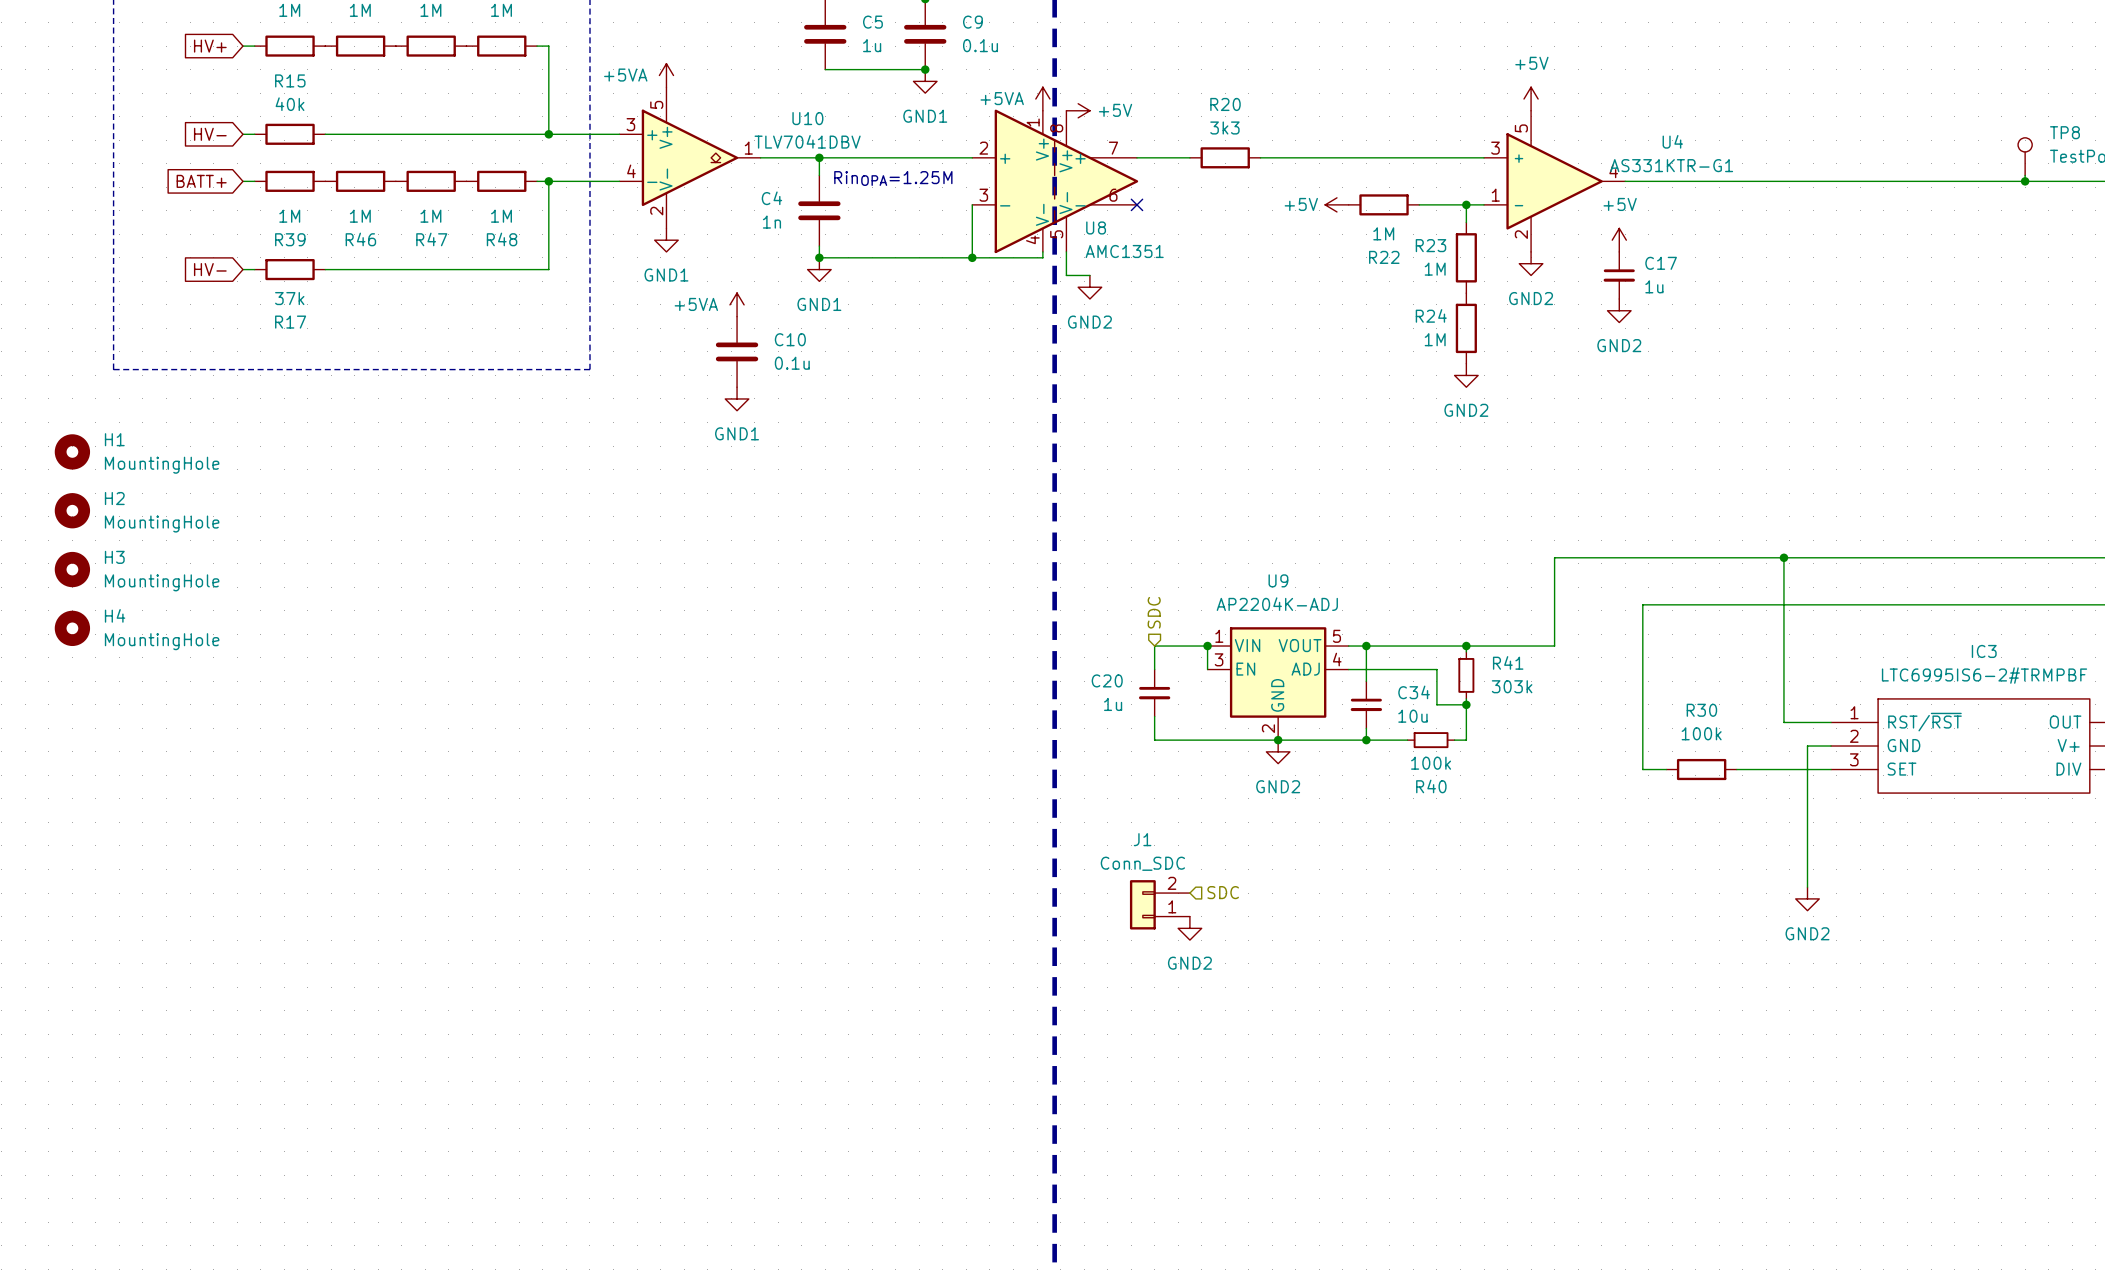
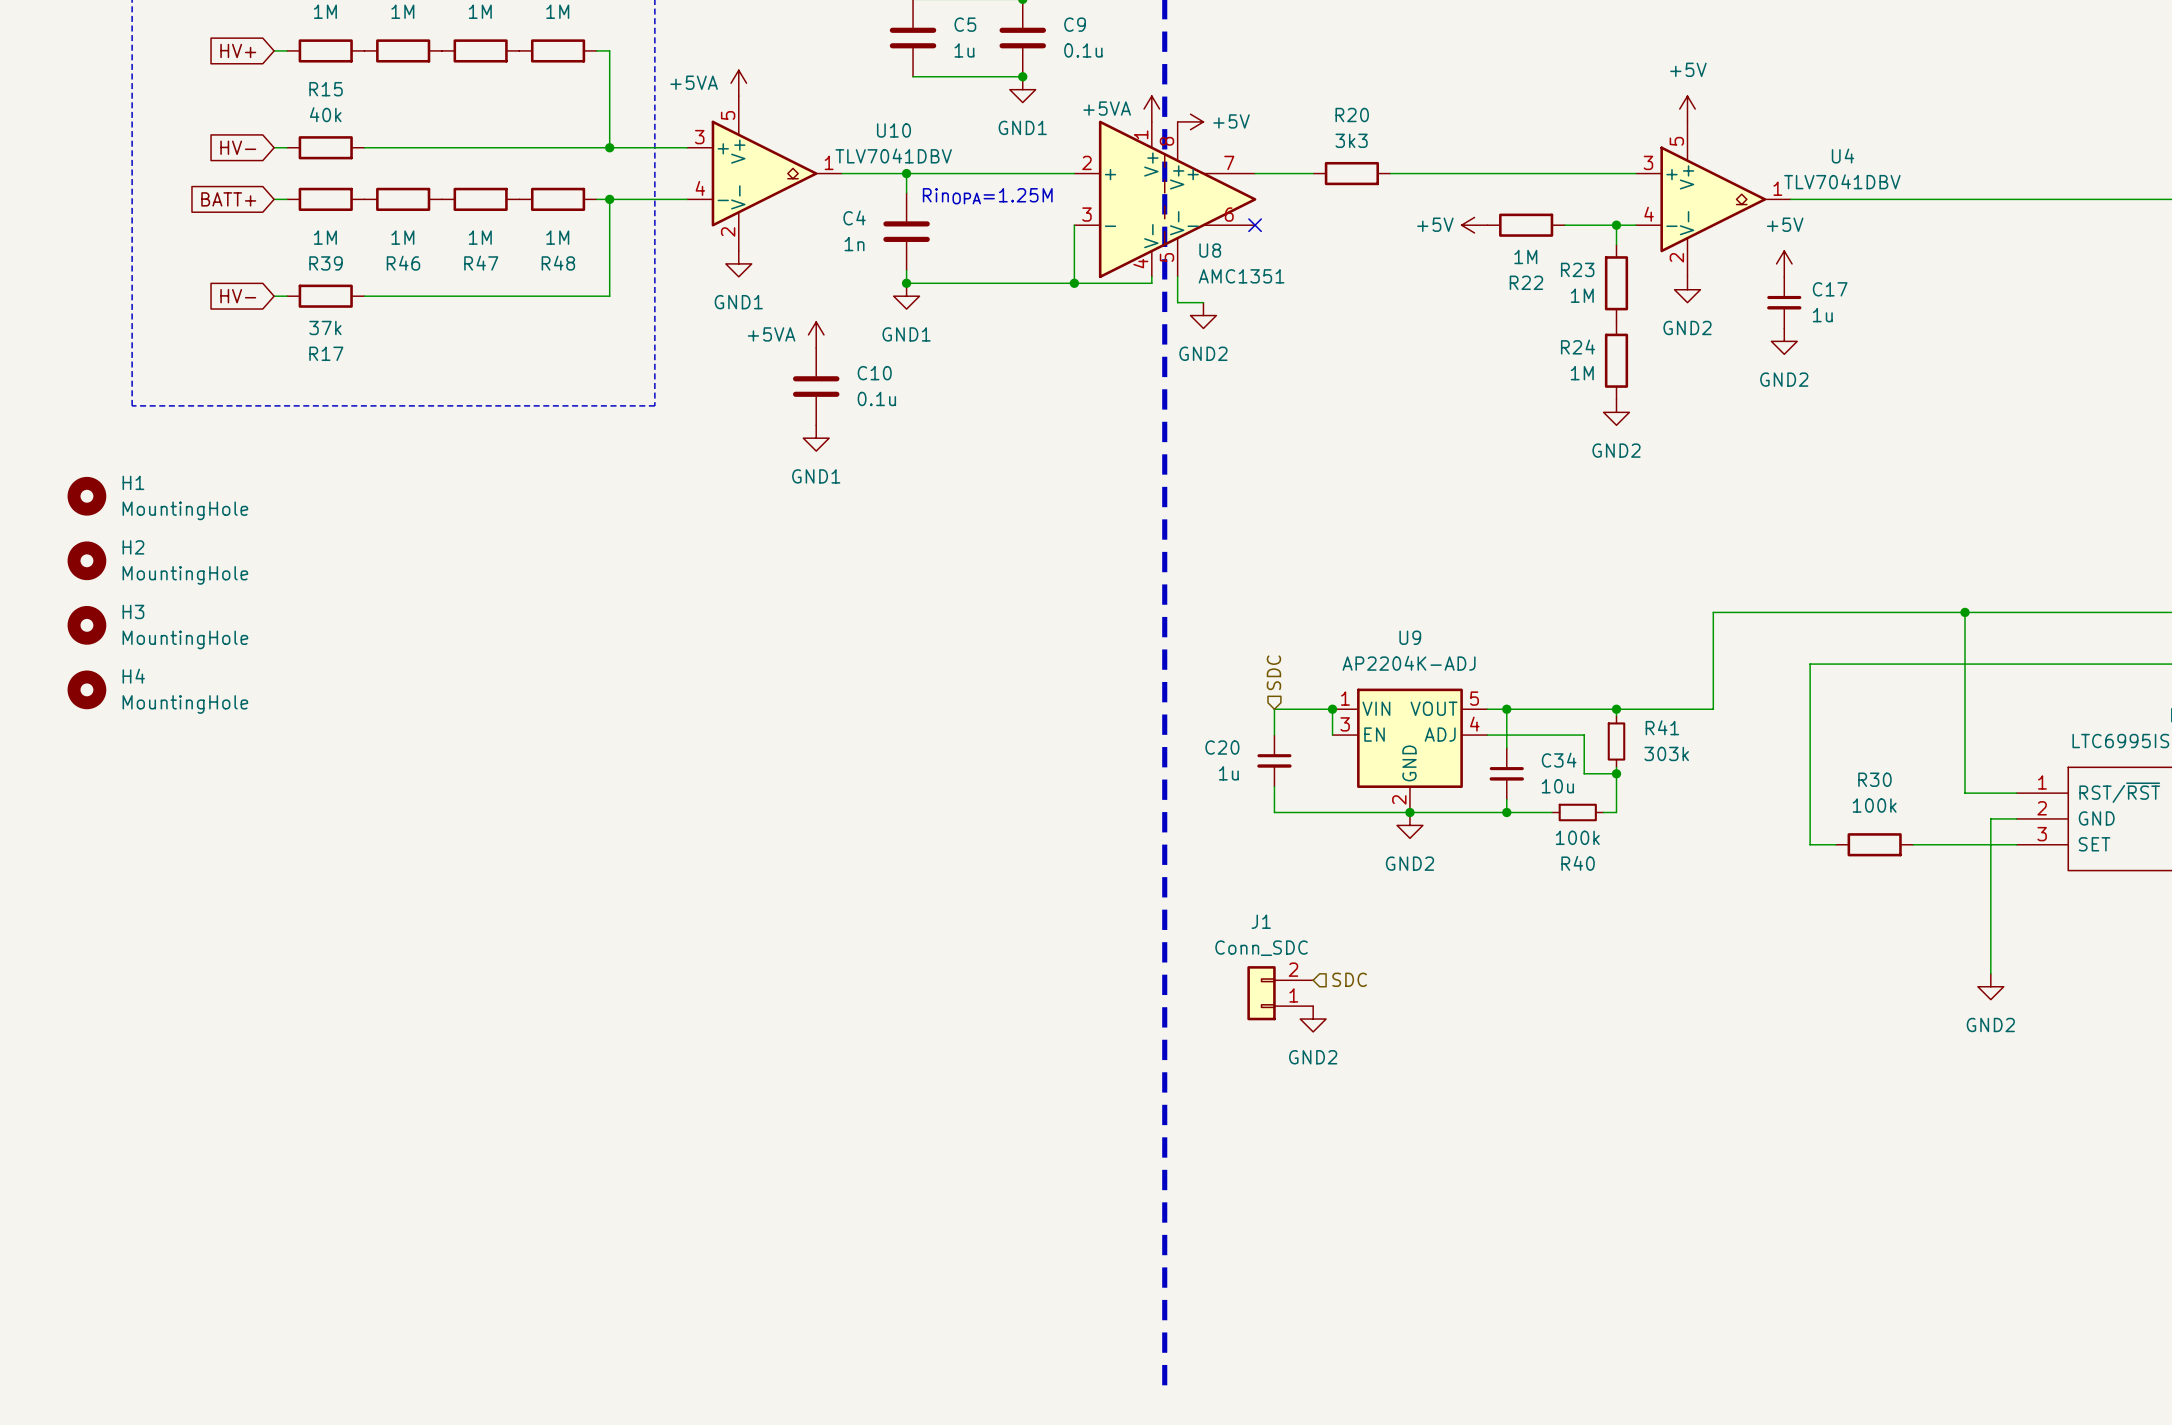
U4 symbol: [1484, 110, 1626, 252] -> [1635, 121, 1791, 277]
U4 value: AS331KTR-G1 (1671, 165) -> TLV7041DBV (1842, 181)

